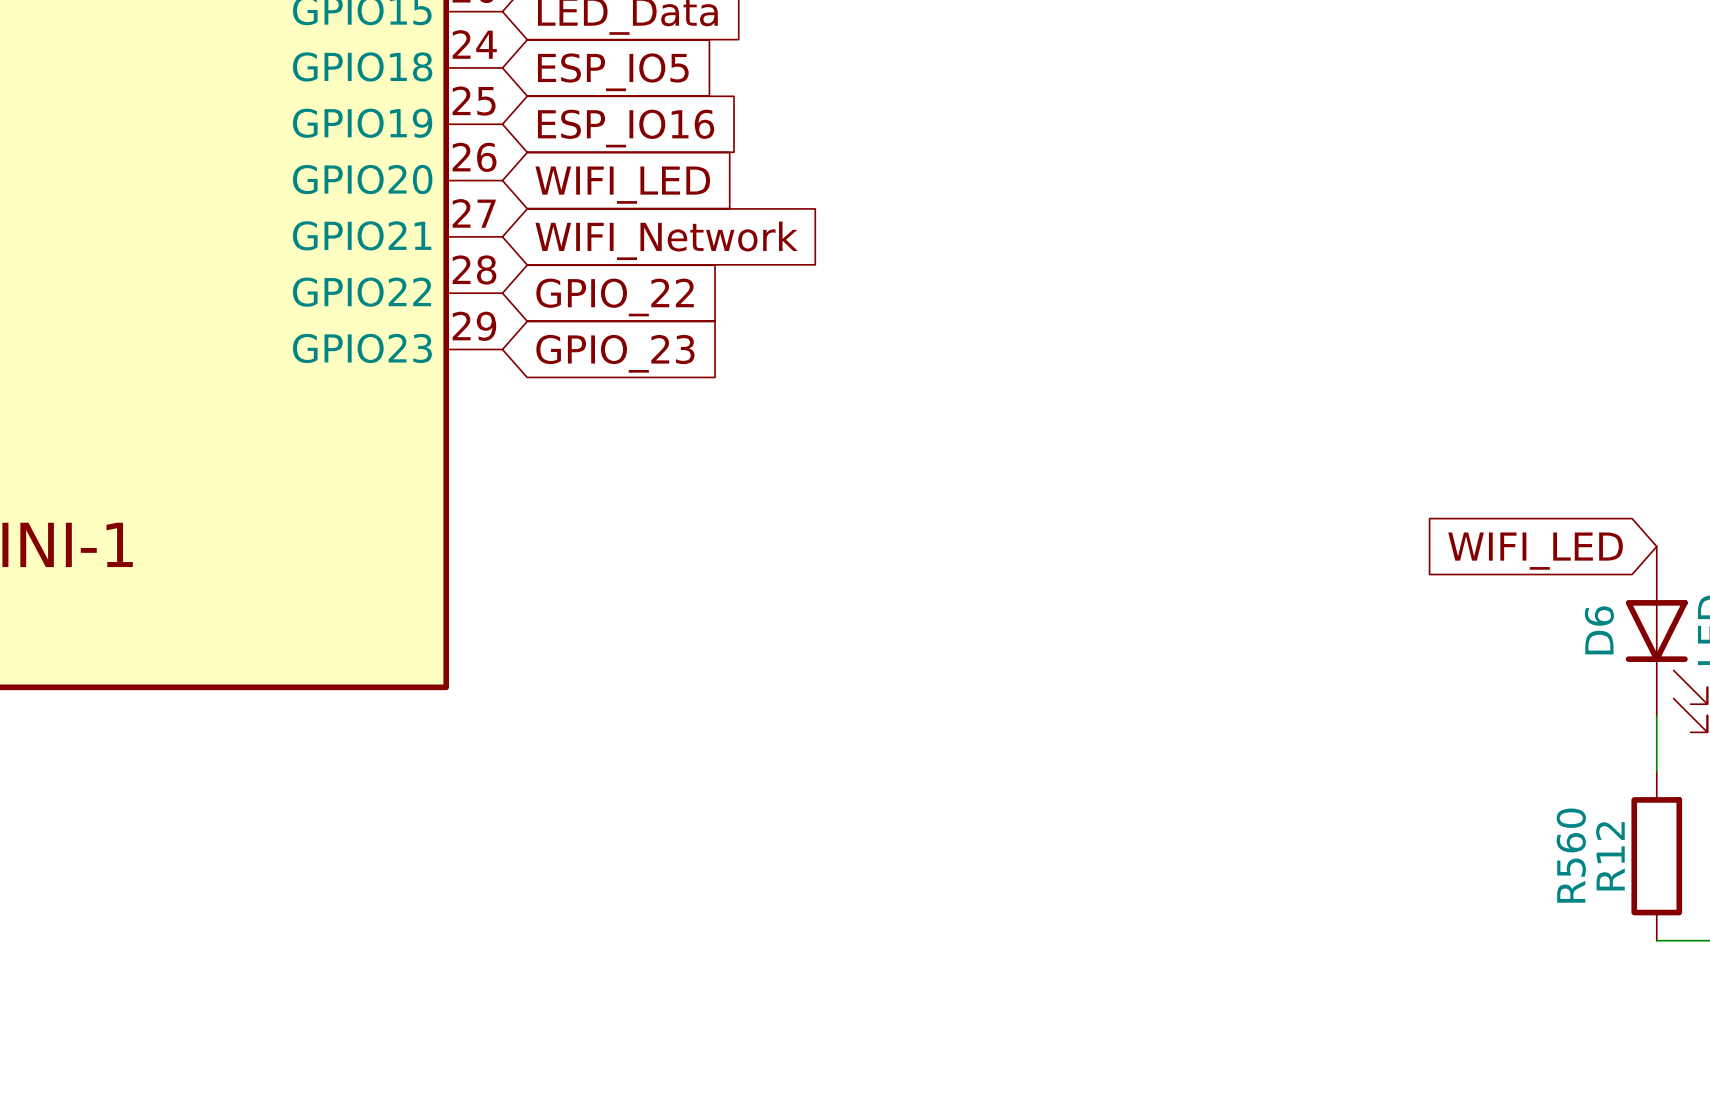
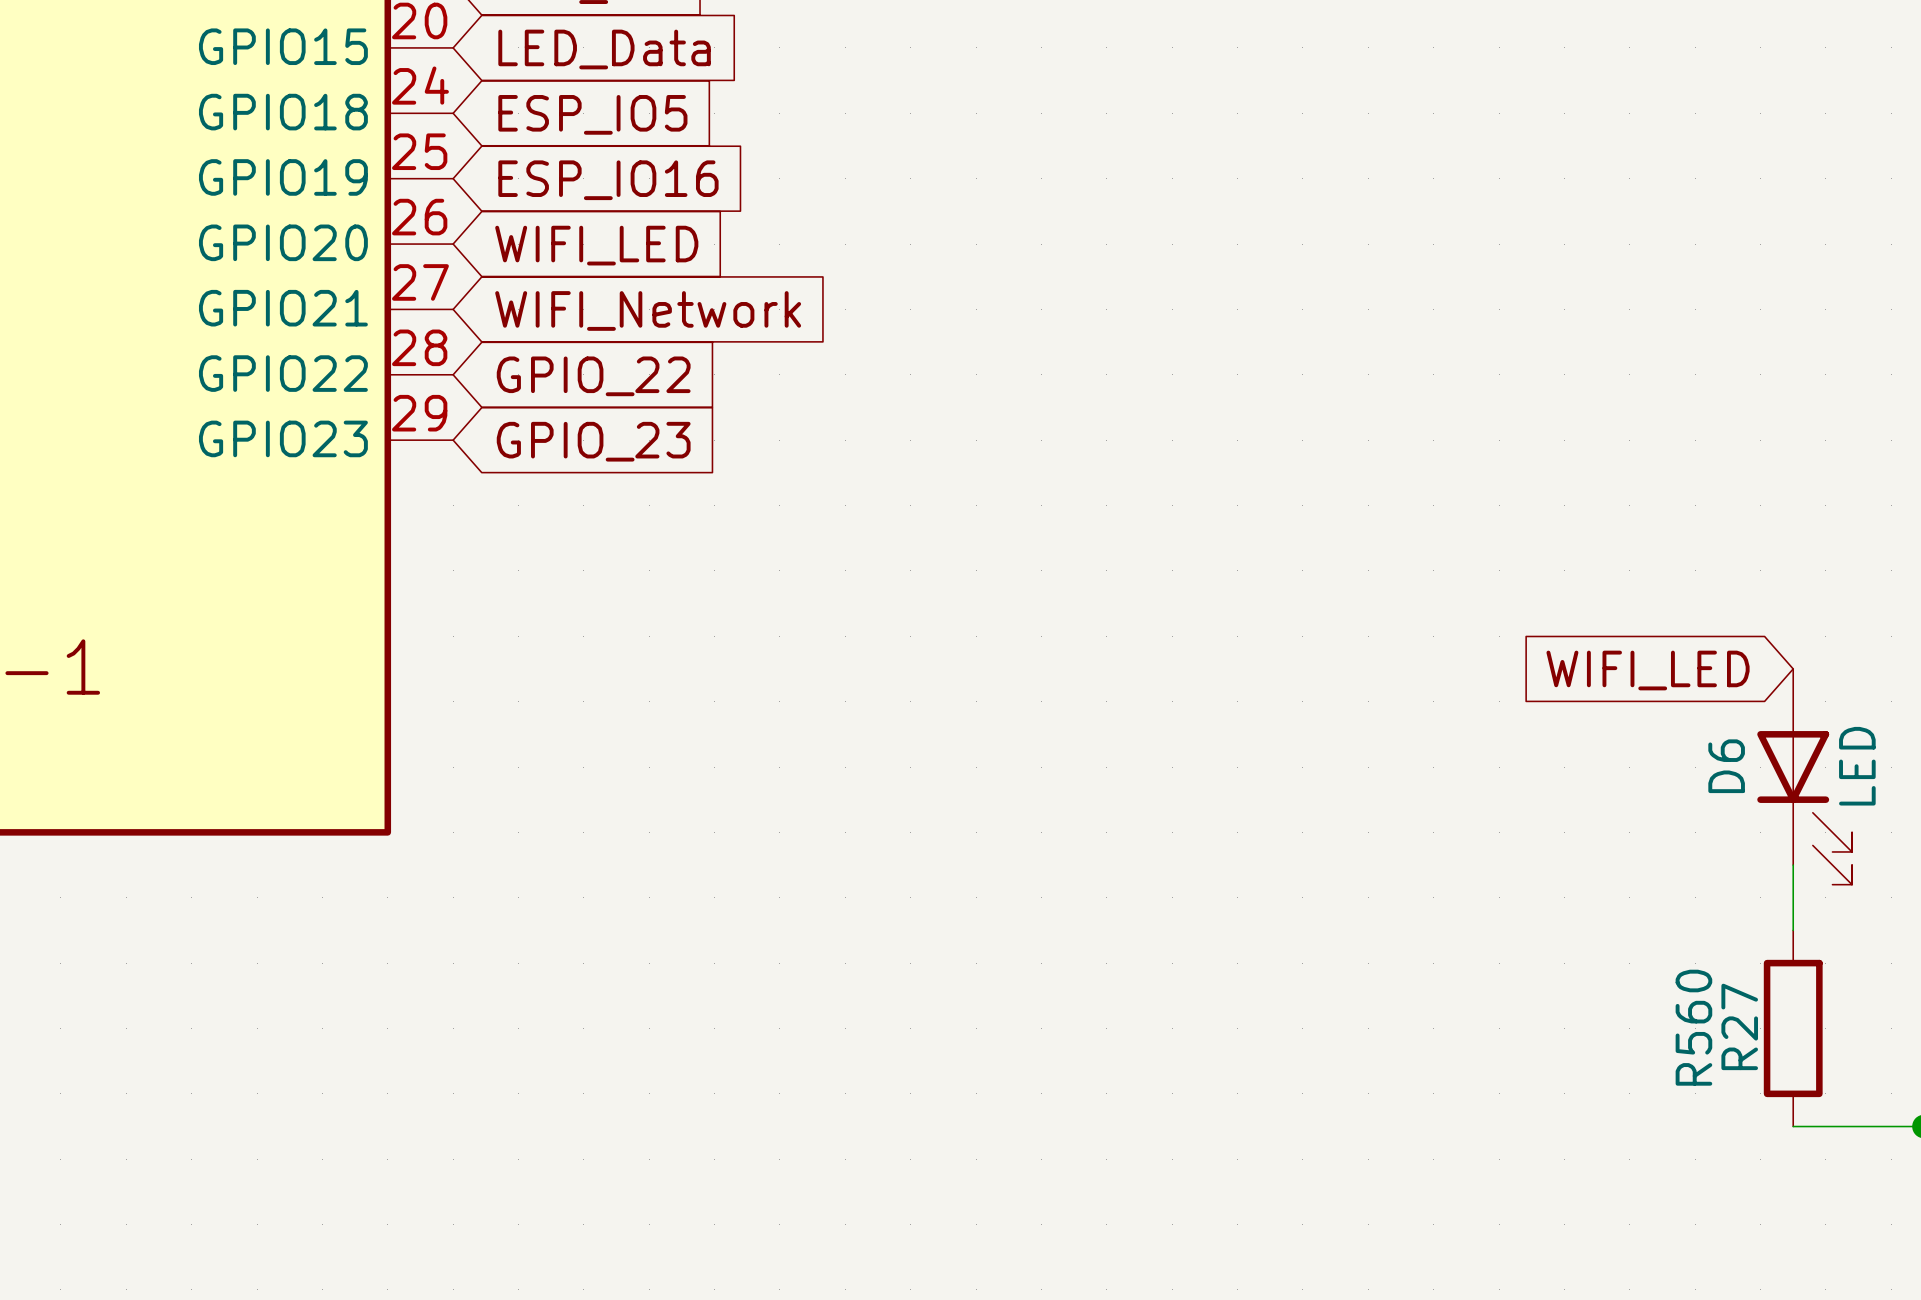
R12 name: R12 (1610, 856) -> R27 (1739, 1026)

